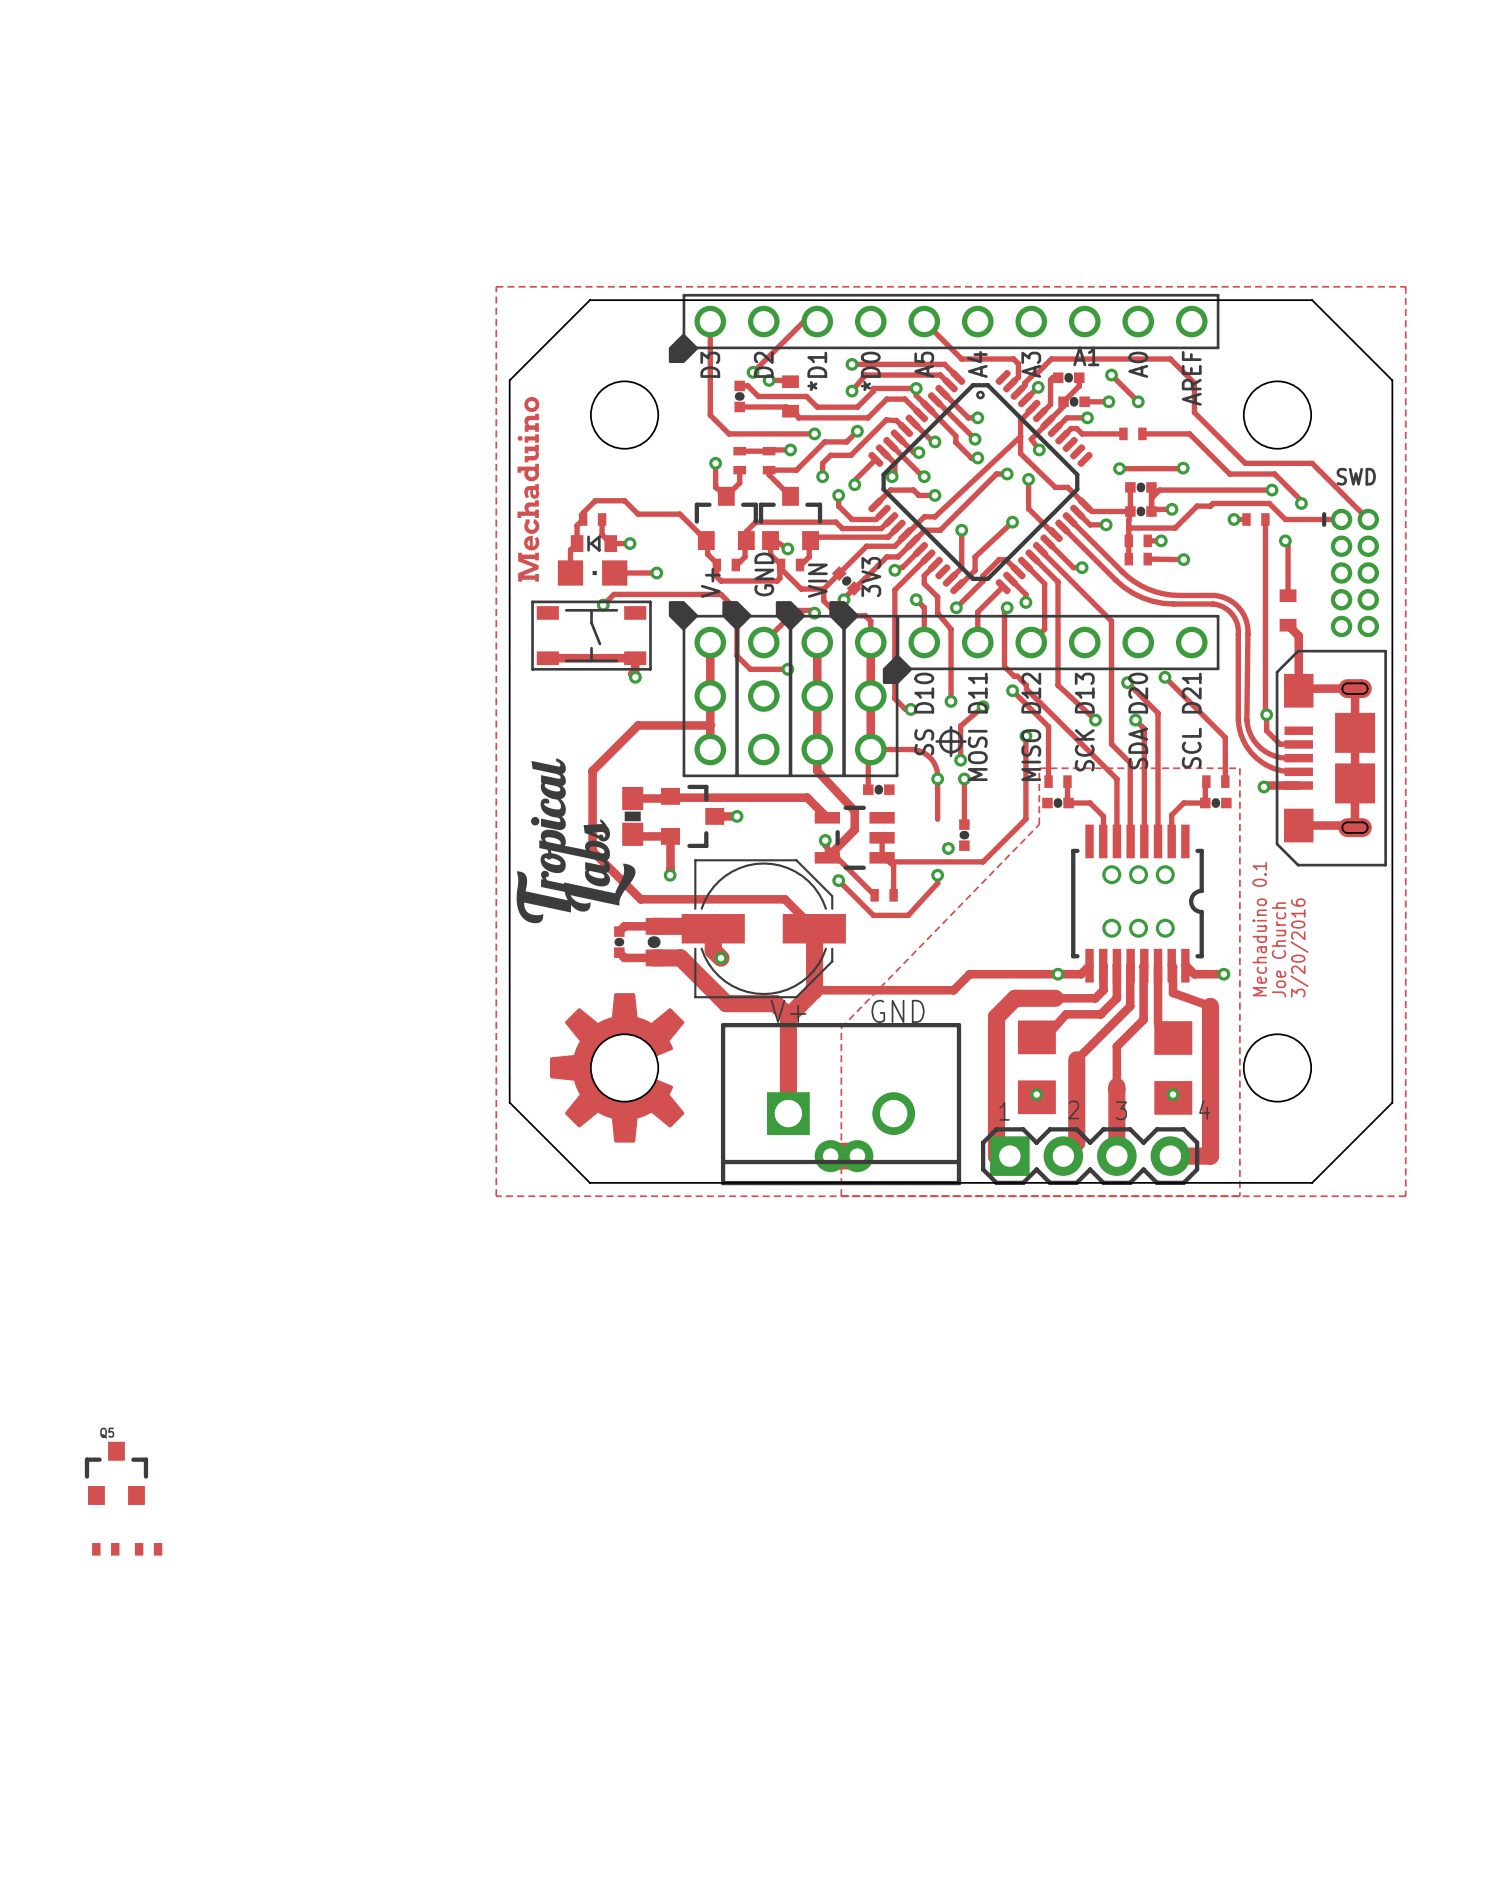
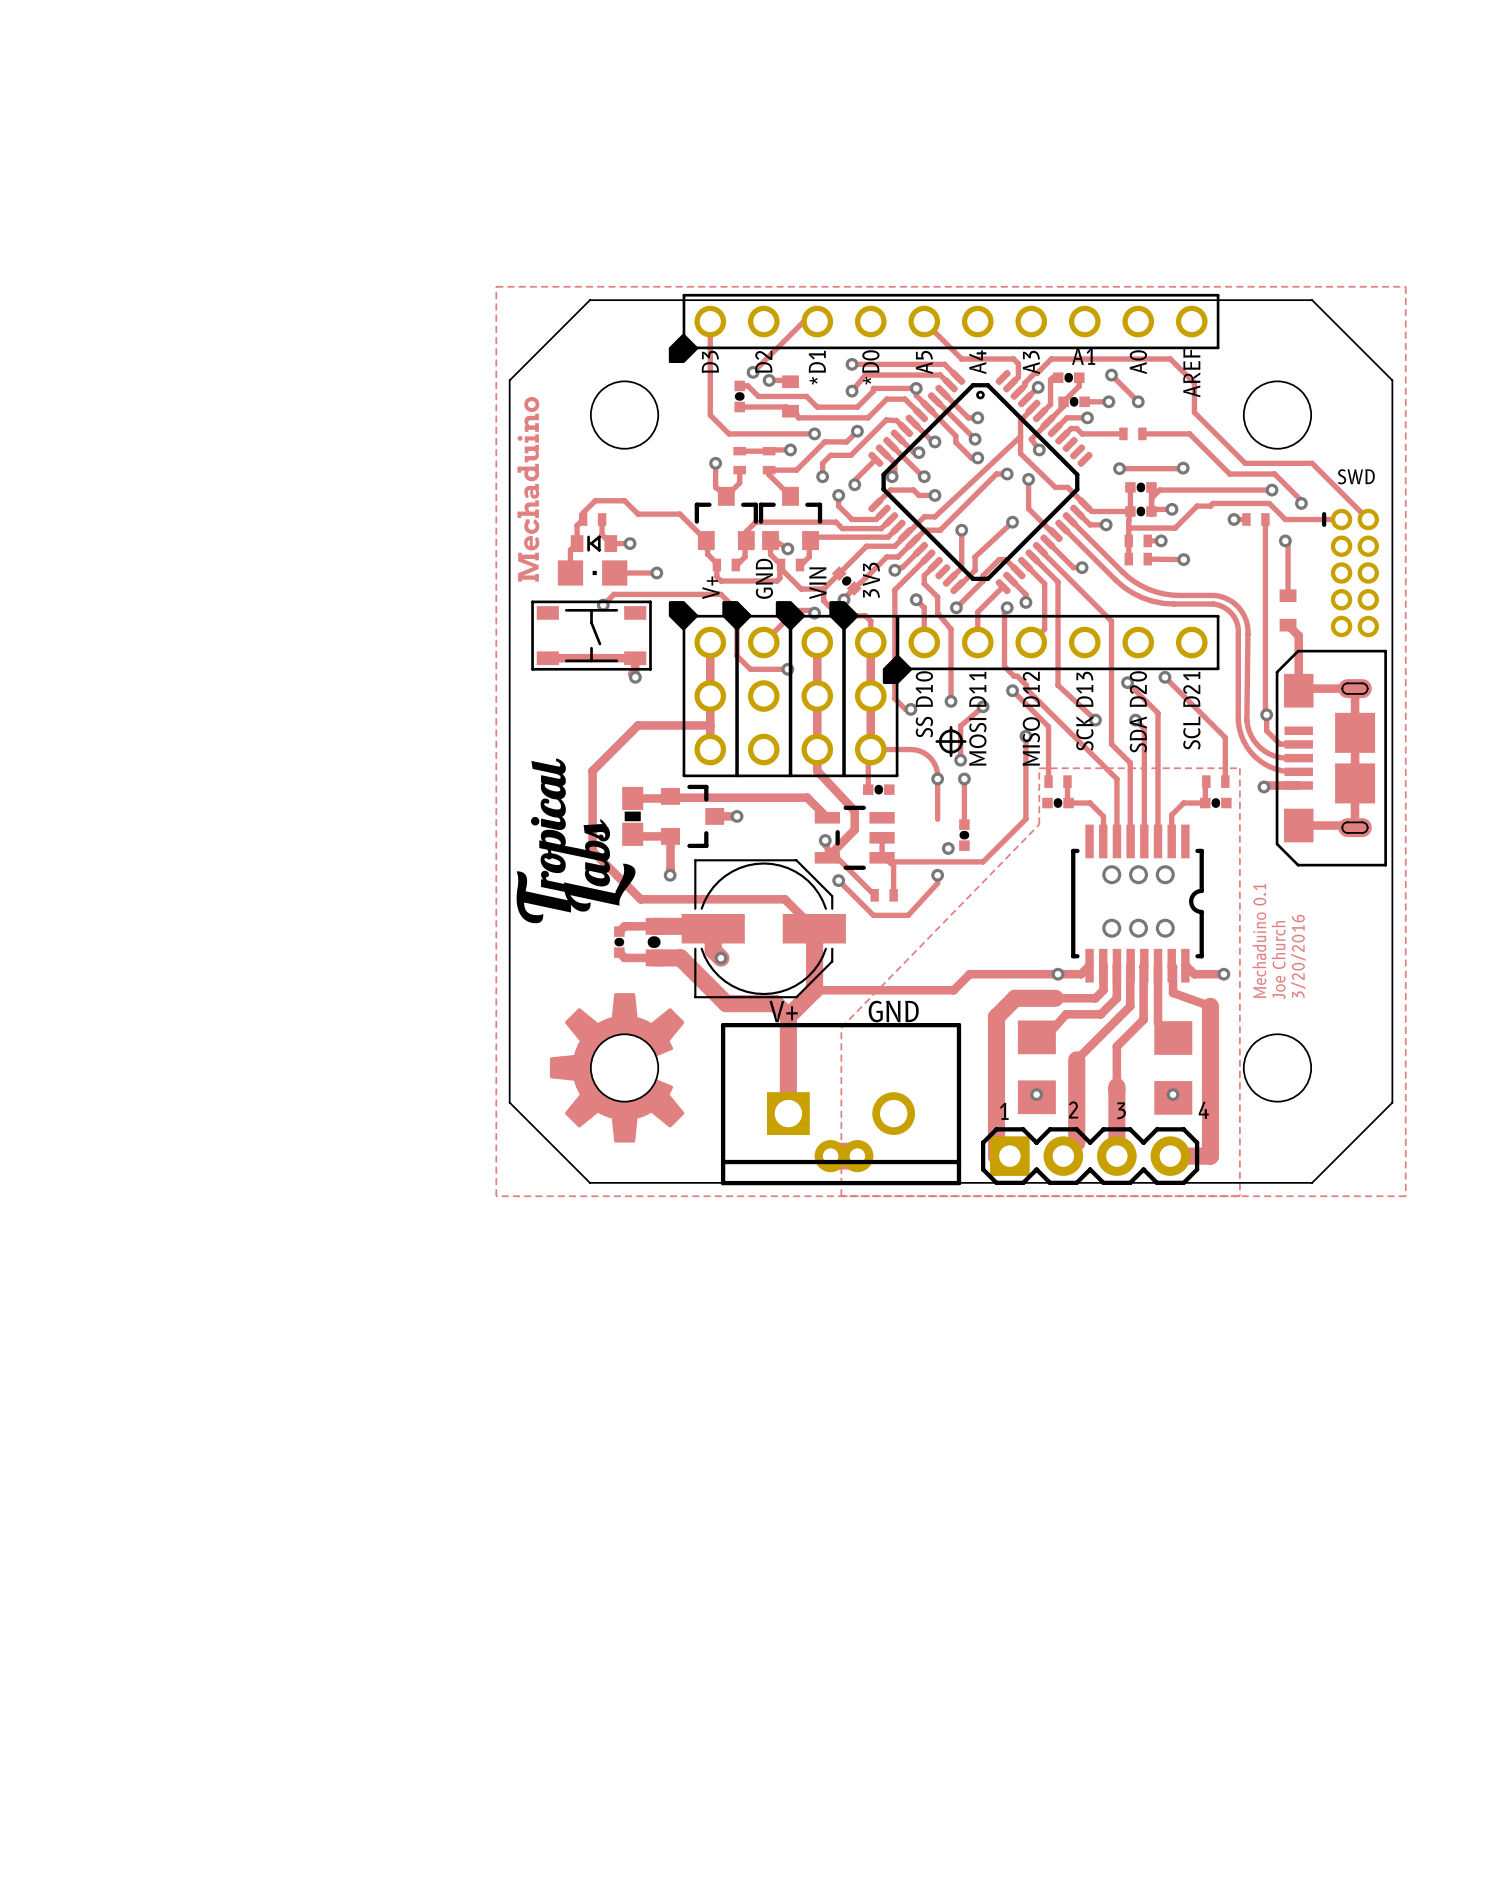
Q5: (116, 1473) -> none
part: (105, 1549) -> none
part: (148, 1549) -> none

